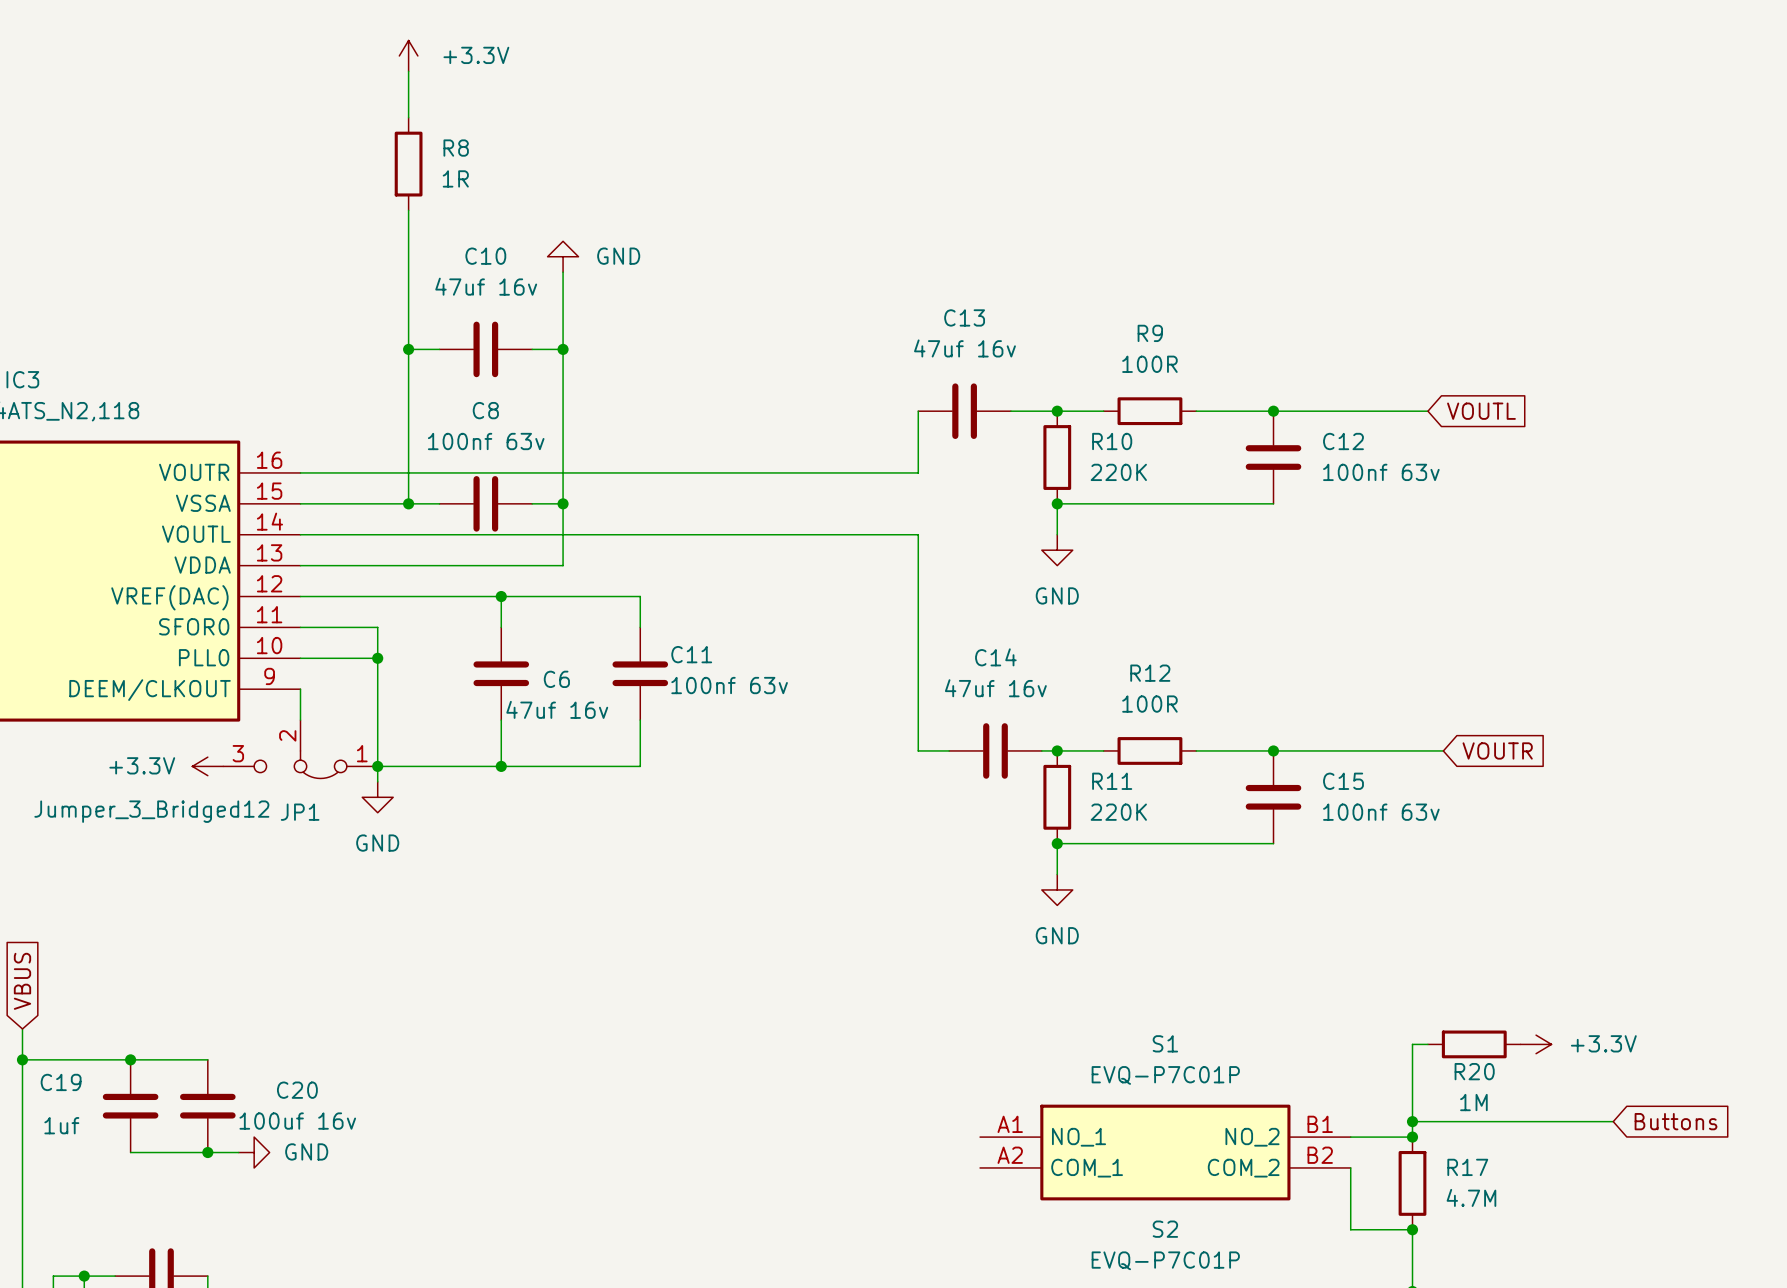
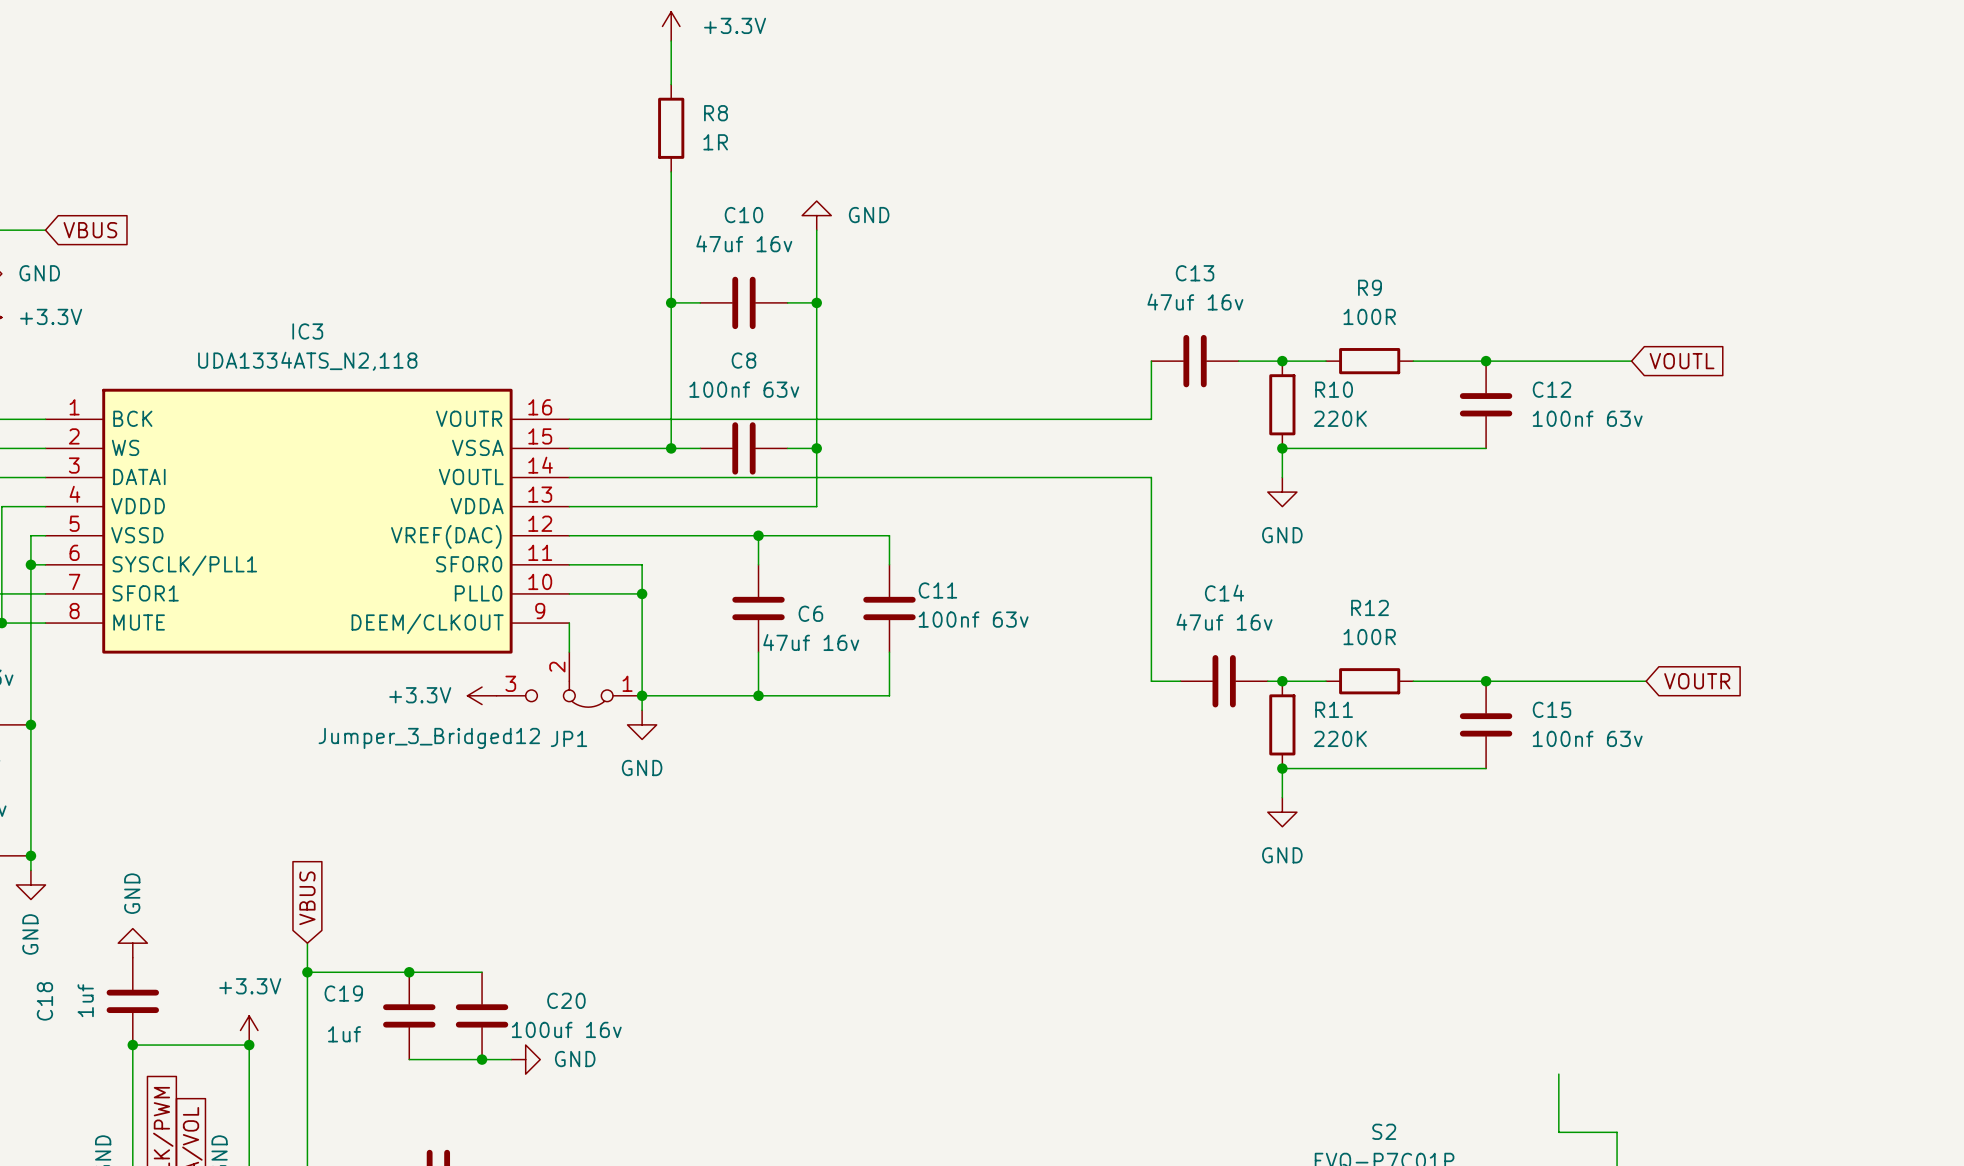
wire: (1427, 1044) (1412, 1044) (1412, 1137) (1350, 1137) -> none
R20: 1M (1474, 1044) -> none
power symbol: +3.3V (1536, 1044) -> none
wire: (1412, 1121) (1613, 1121) -> none
junction: (1412, 1121) -> none
global label: Buttons (1676, 1121) -> none
junction: (1412, 1137) -> none
S1: EVQ-P7C01P (1165, 1152) -> none
R17: 4.7M (1412, 1183) -> none
junction: (1412, 1229) -> none

